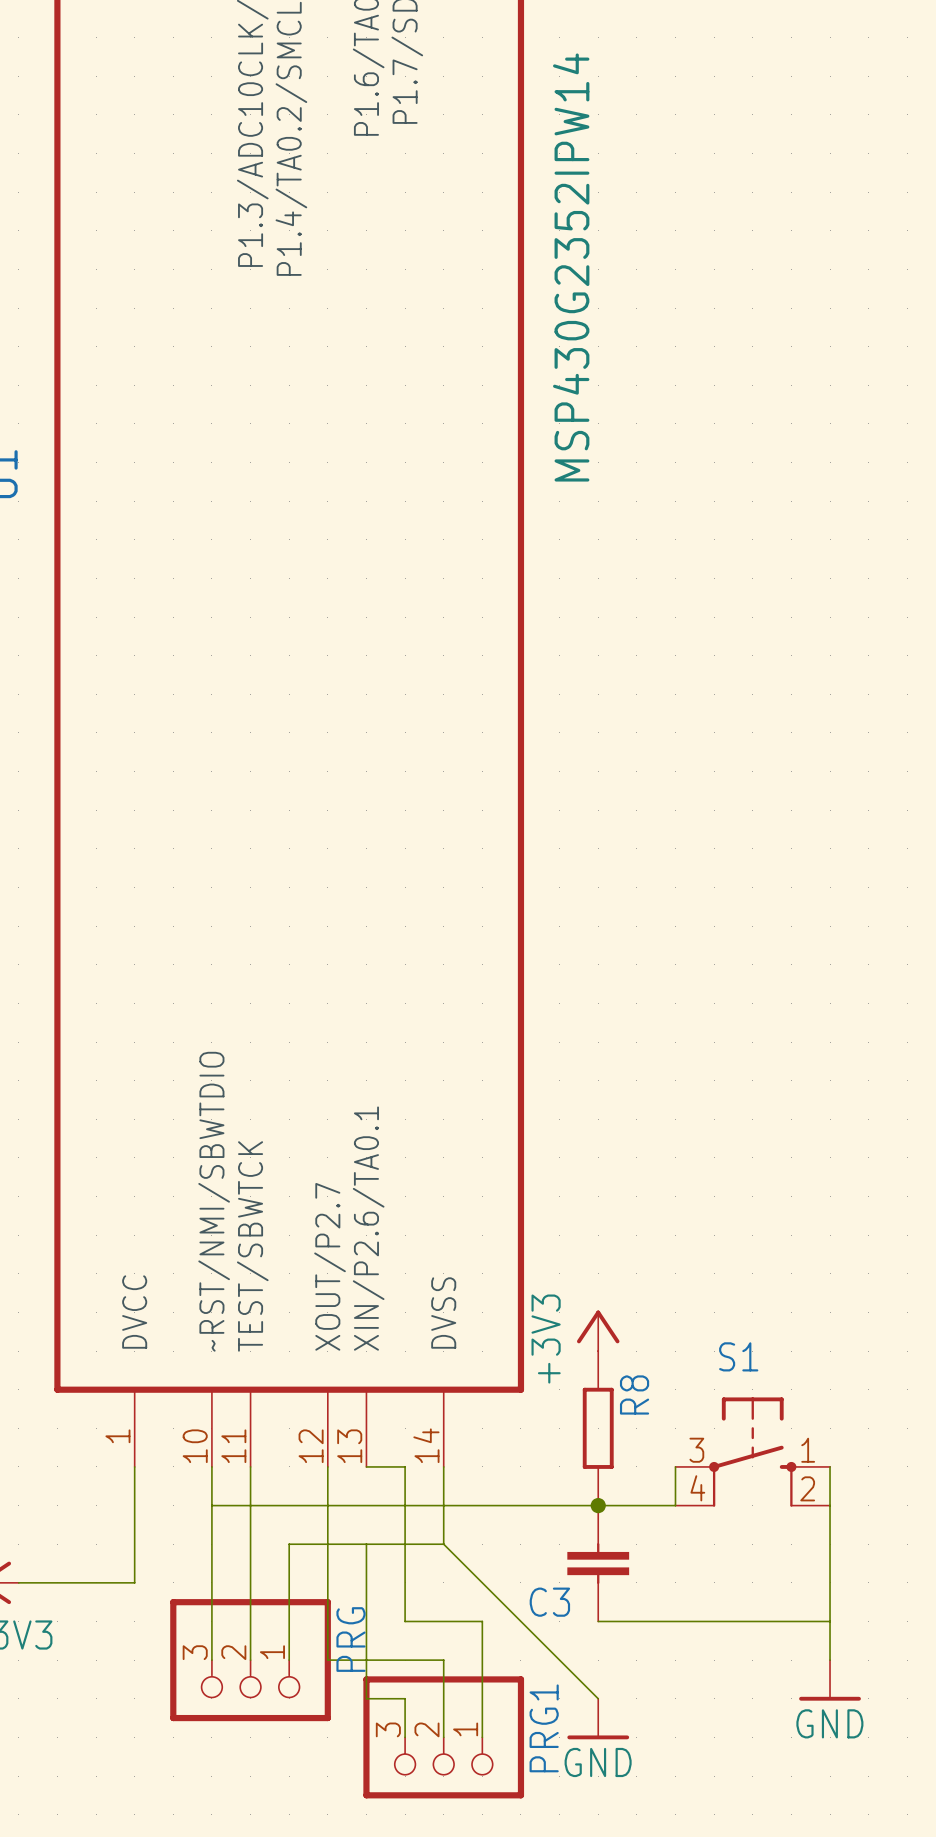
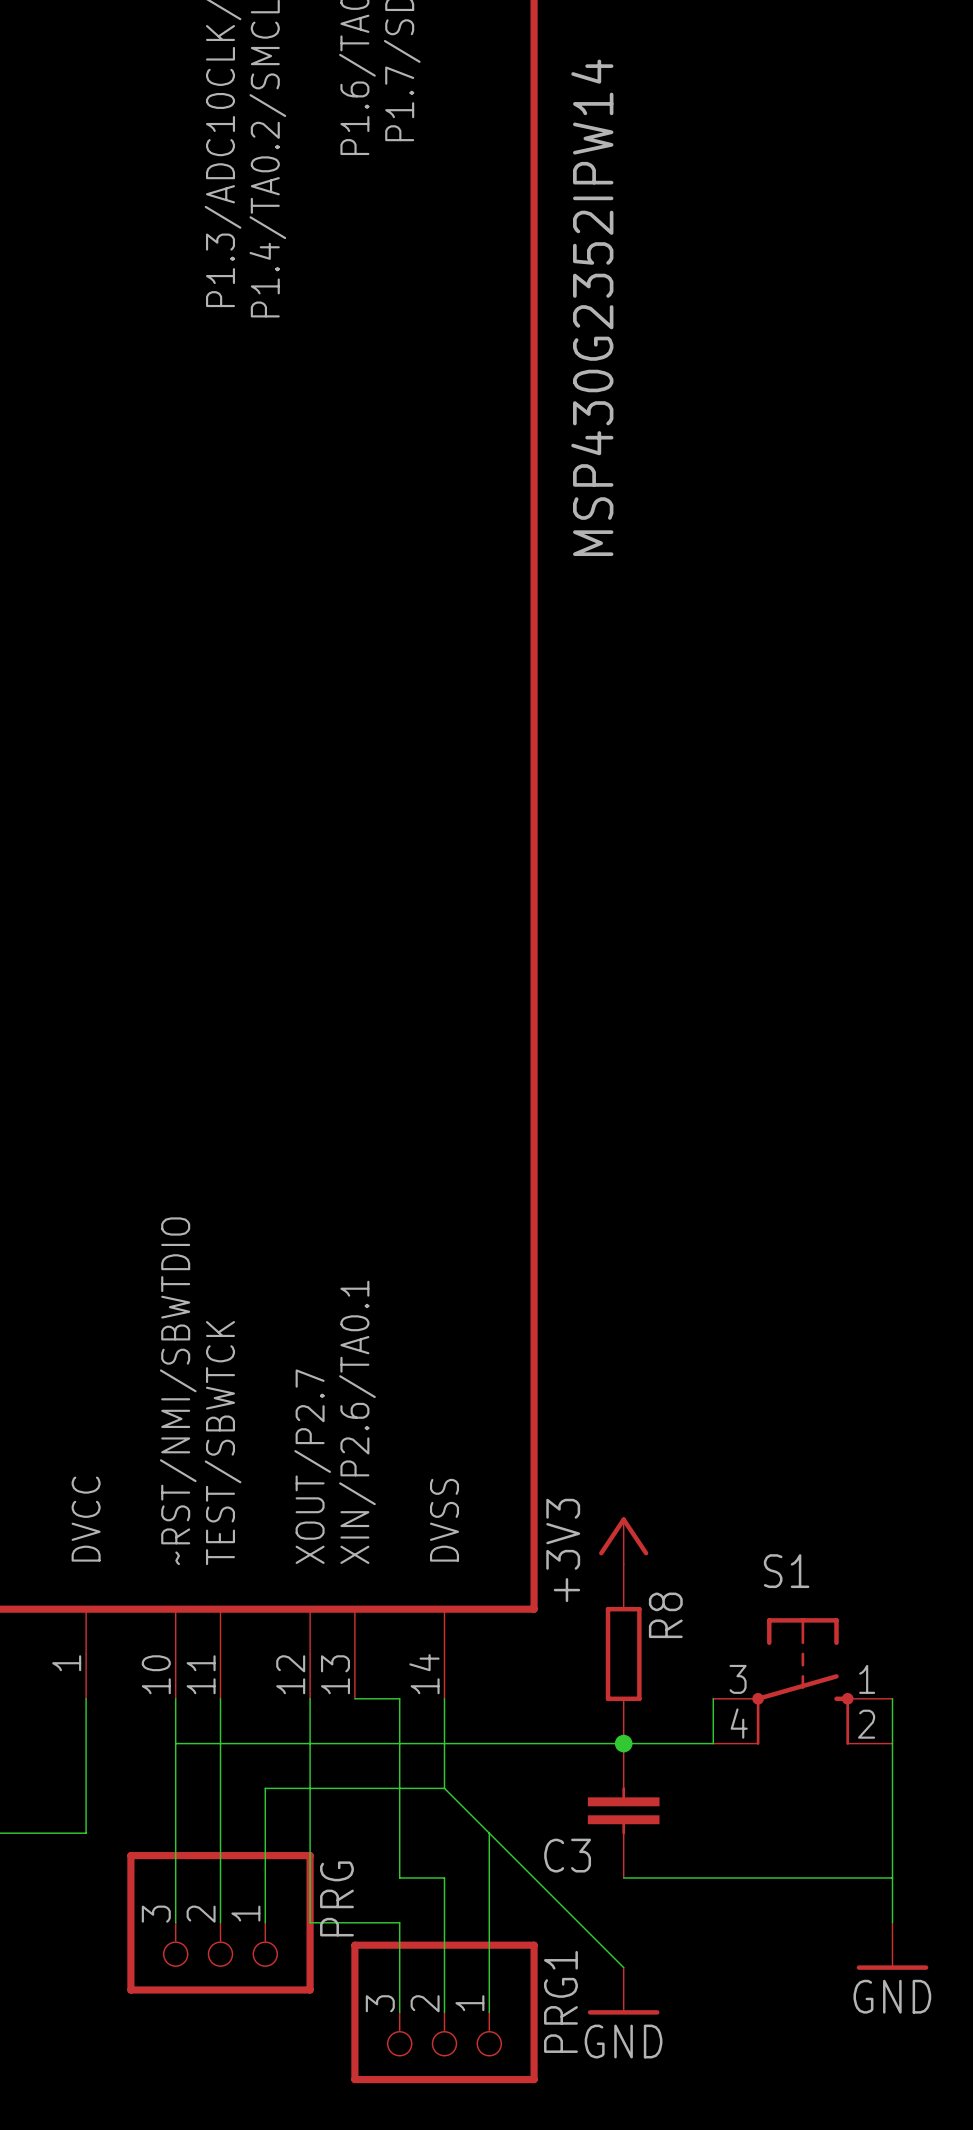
wire: (366, 1544) (366, 1698) (405, 1698) -> none
wire: none -> (489, 1833) (489, 1877)
wire: (443, 1621) (482, 1621) -> (444, 1877) (444, 1922)
wire: (405, 1660) (443, 1660) -> (399, 1922) (399, 1967)

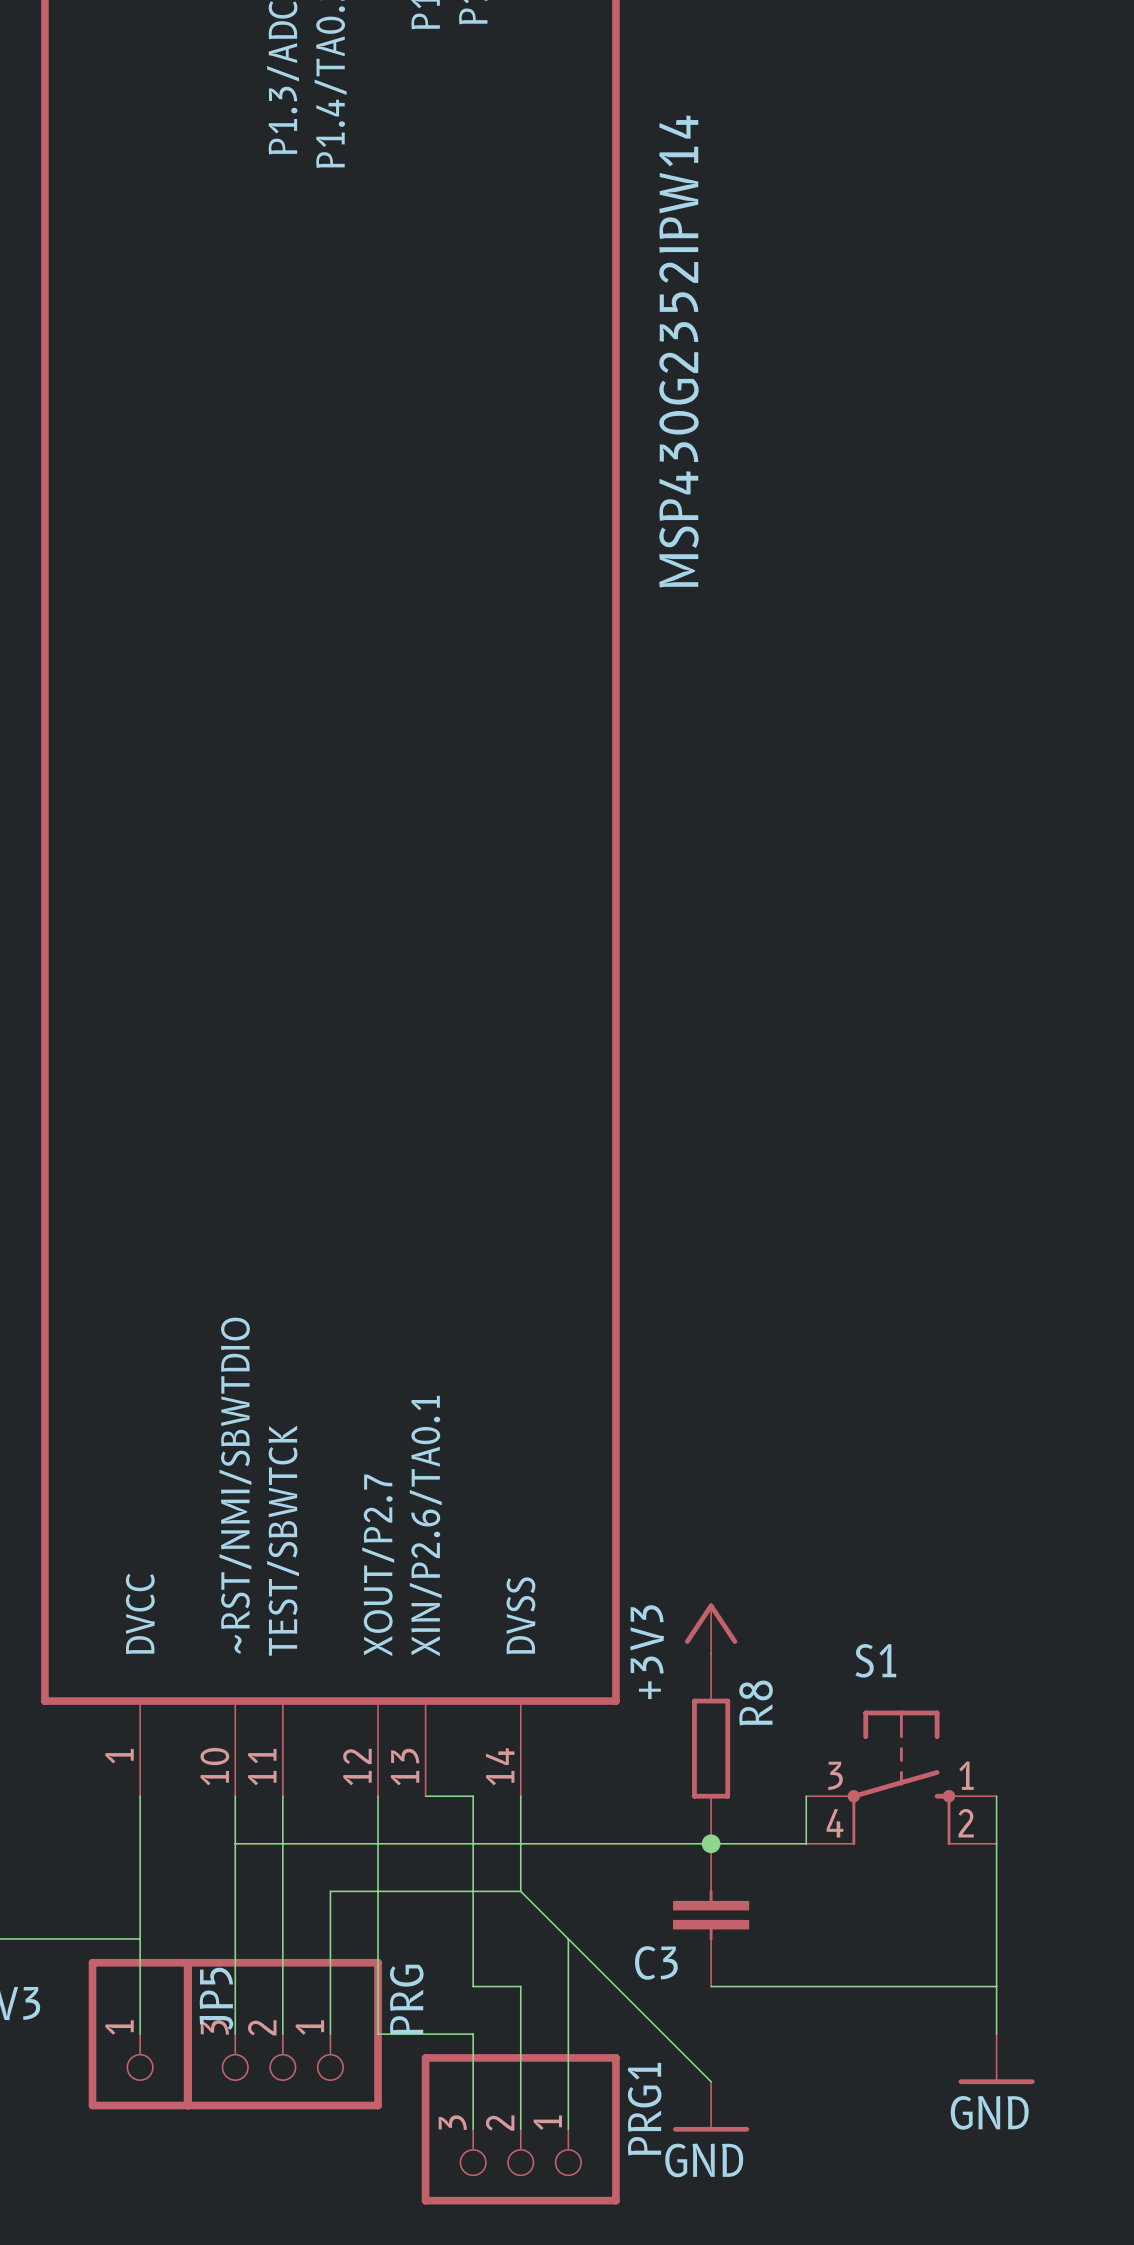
wire: none -> (140, 1938) (140, 2034)
JP5: none -> (140, 2034)

